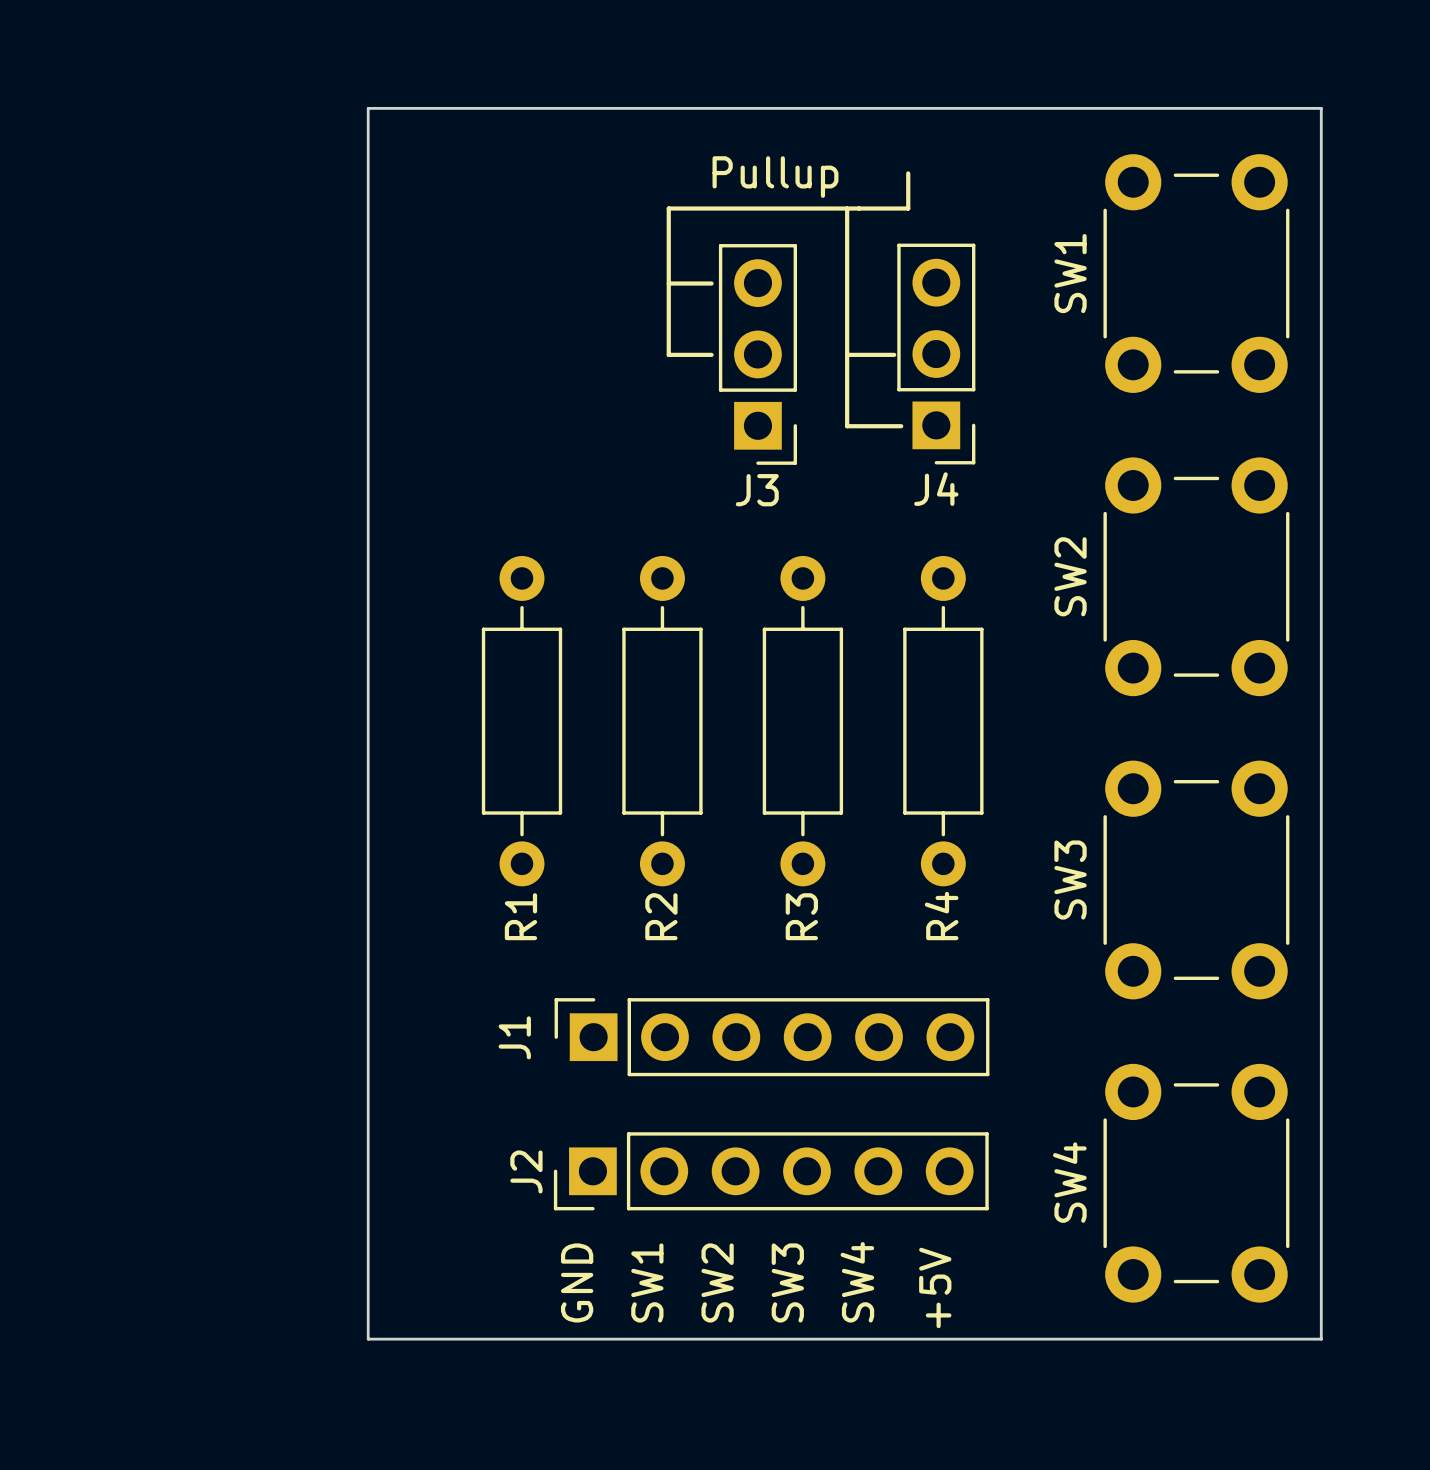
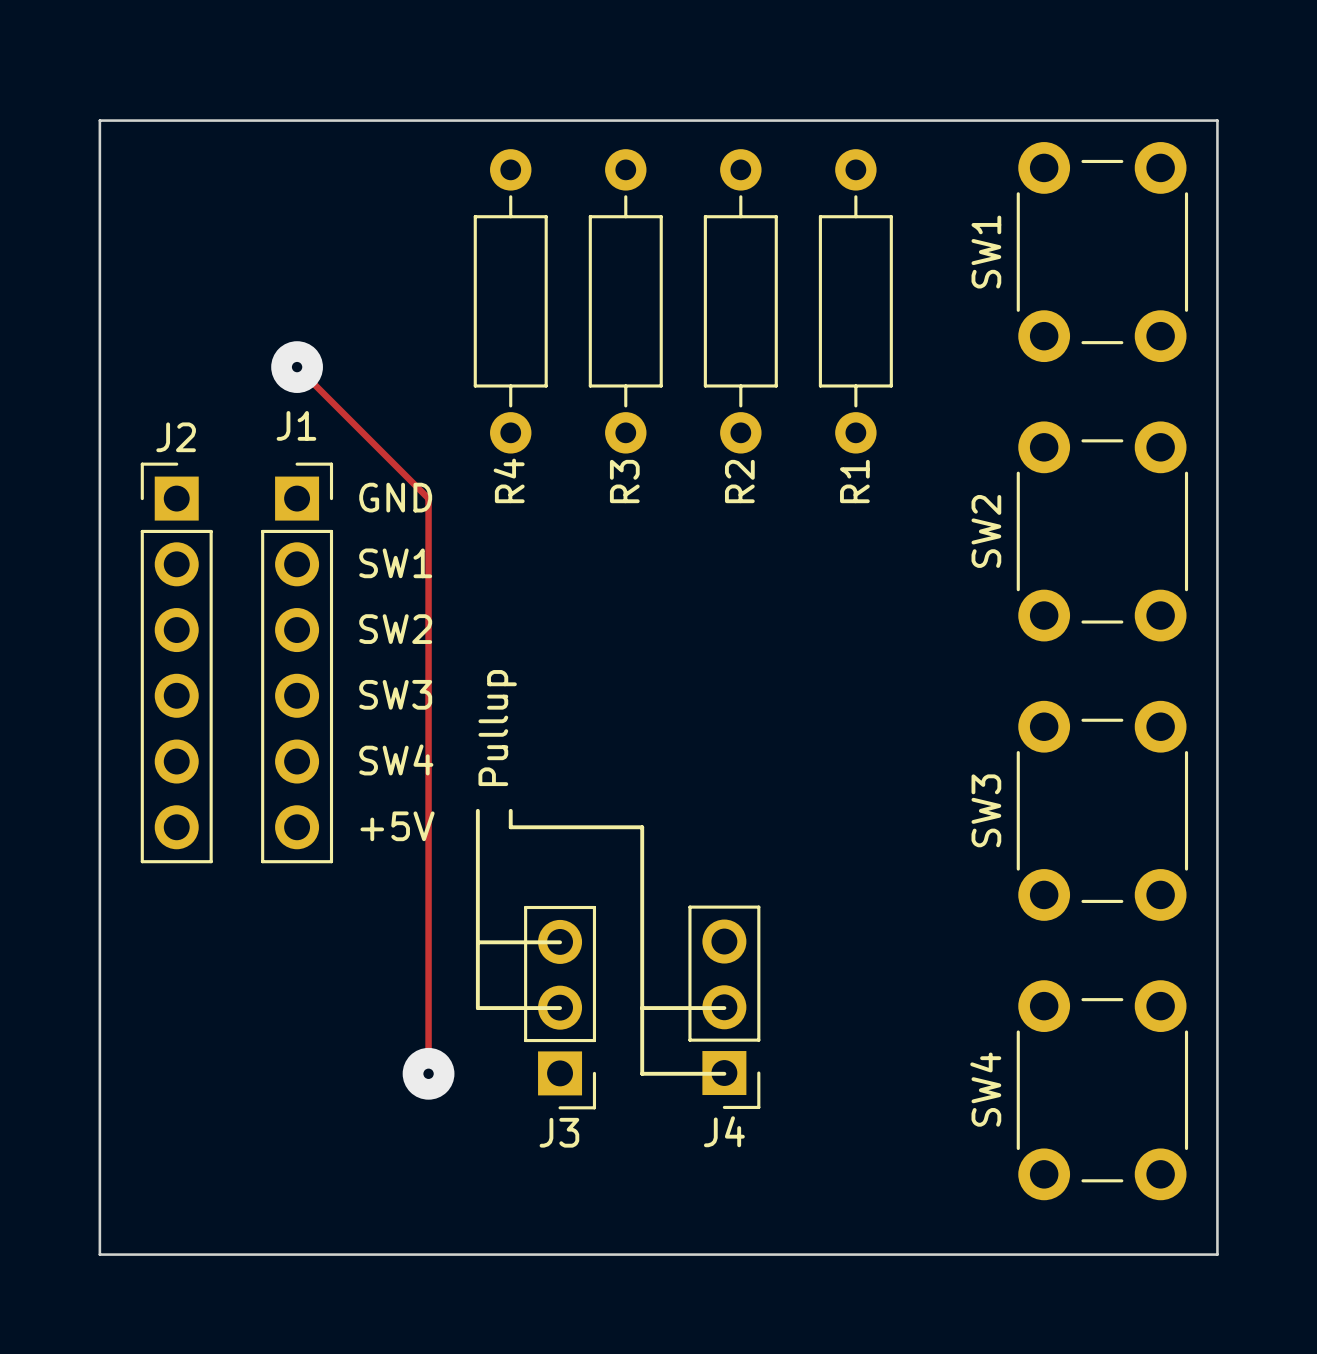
board edge: (1321, 130) (1321, 108) (368, 108) (368, 1339) (1321, 1339) -> (1217, 120) (99, 120) (99, 1254) (1217, 1254) (1217, 1233)
line: (908, 173) (908, 208) (668, 208) (668, 354) (711, 354) -> none
text rotation: 0° (775, 177) -> 90° counterclockwise (497, 728)
text position: Pullup (775, 177) -> Pullup (497, 728)
line: (847, 208) (847, 426) (901, 426) -> none
line: (668, 283) (711, 283) -> none
J3 position: (757, 354) -> (560, 1007)
line: (847, 354) (894, 354) -> none
J4 position: (936, 354) -> (724, 1007)
track: none -> (297, 367) (428, 498) (428, 1073)
via: none -> (297, 367)
text: none -> GND (395, 497)
text: none -> SW1 (395, 563)
R1 position: (522, 721) -> (855, 301)
R2 position: (662, 721) -> (740, 301)
R3 position: (802, 721) -> (625, 301)
R4 position: (943, 721) -> (510, 301)
line: none -> (477, 810) (477, 1008) (560, 1008)
line: none -> (510, 810) (510, 827) (642, 827) (642, 1073) (724, 1073)
line: none -> (477, 942) (560, 942)
J1 rotation: 0° (772, 1037) -> 90° clockwise (297, 662)
J1 position: (772, 1037) -> (297, 662)
line: none -> (642, 1008) (724, 1008)
via: none -> (428, 1073)
J2 rotation: 0° (771, 1171) -> 90° clockwise (176, 662)
J2 position: (771, 1171) -> (176, 662)
text: GND (577, 1282) -> none
text: SW1 (647, 1282) -> none
text rotation: 0° (717, 1282) -> 90° clockwise (395, 629)
text position: SW2 (717, 1282) -> SW2 (395, 629)
text rotation: 0° (787, 1282) -> 90° clockwise (395, 694)
text position: SW3 (787, 1282) -> SW3 (395, 694)
text rotation: 0° (857, 1282) -> 90° clockwise (396, 759)
text position: SW4 (857, 1282) -> SW4 (396, 759)
text rotation: 0° (935, 1287) -> 90° clockwise (397, 826)
text position: +5V (935, 1287) -> +5V (397, 826)

